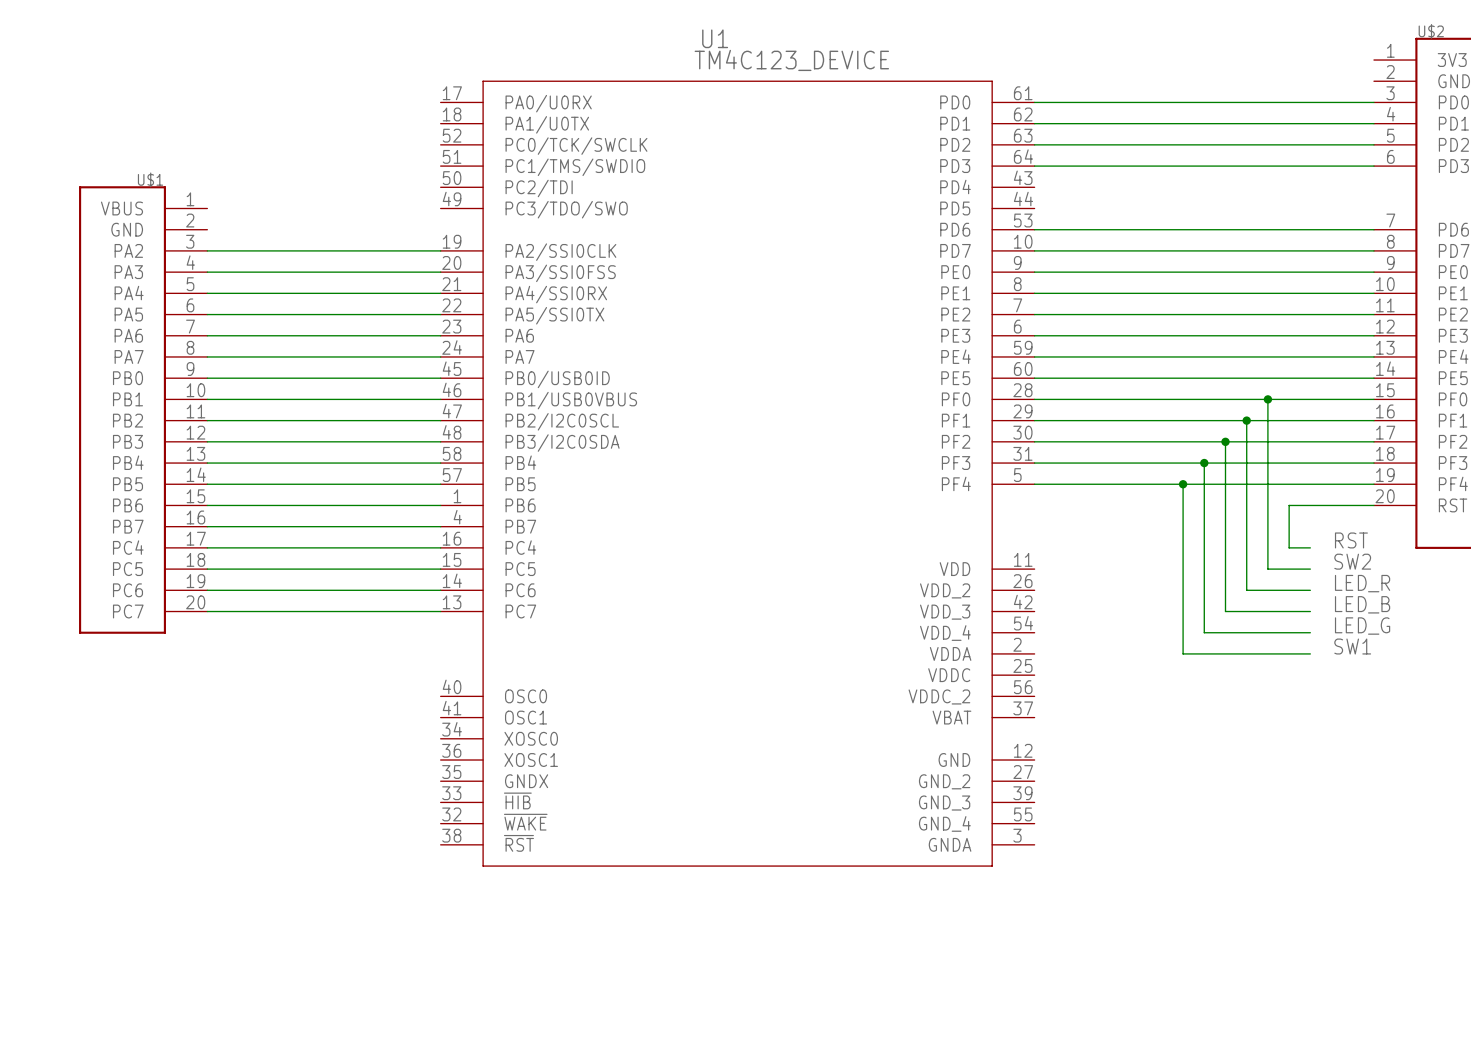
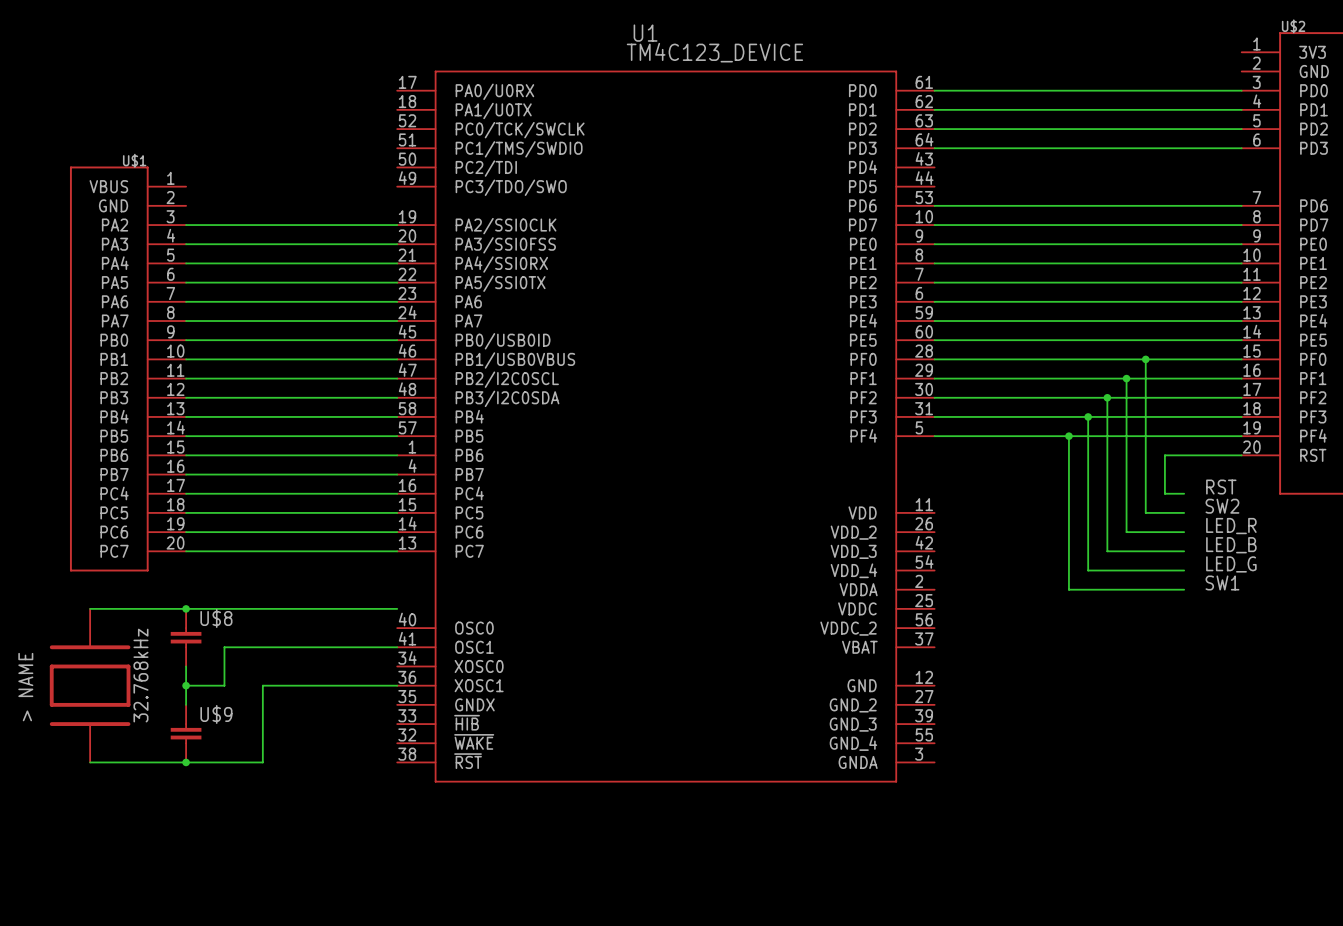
wire: none -> (90, 608) (397, 608)
junction: none -> (186, 608)
U$8: none -> (186, 637)
wire: none -> (397, 647) (224, 647) (224, 685) (186, 685)
wire: none -> (186, 666) (186, 704)
part: none -> (90, 685)
junction: none -> (186, 685)
wire: none -> (397, 685) (262, 685) (262, 762) (90, 762)
U$9: none -> (186, 733)
junction: none -> (186, 762)

